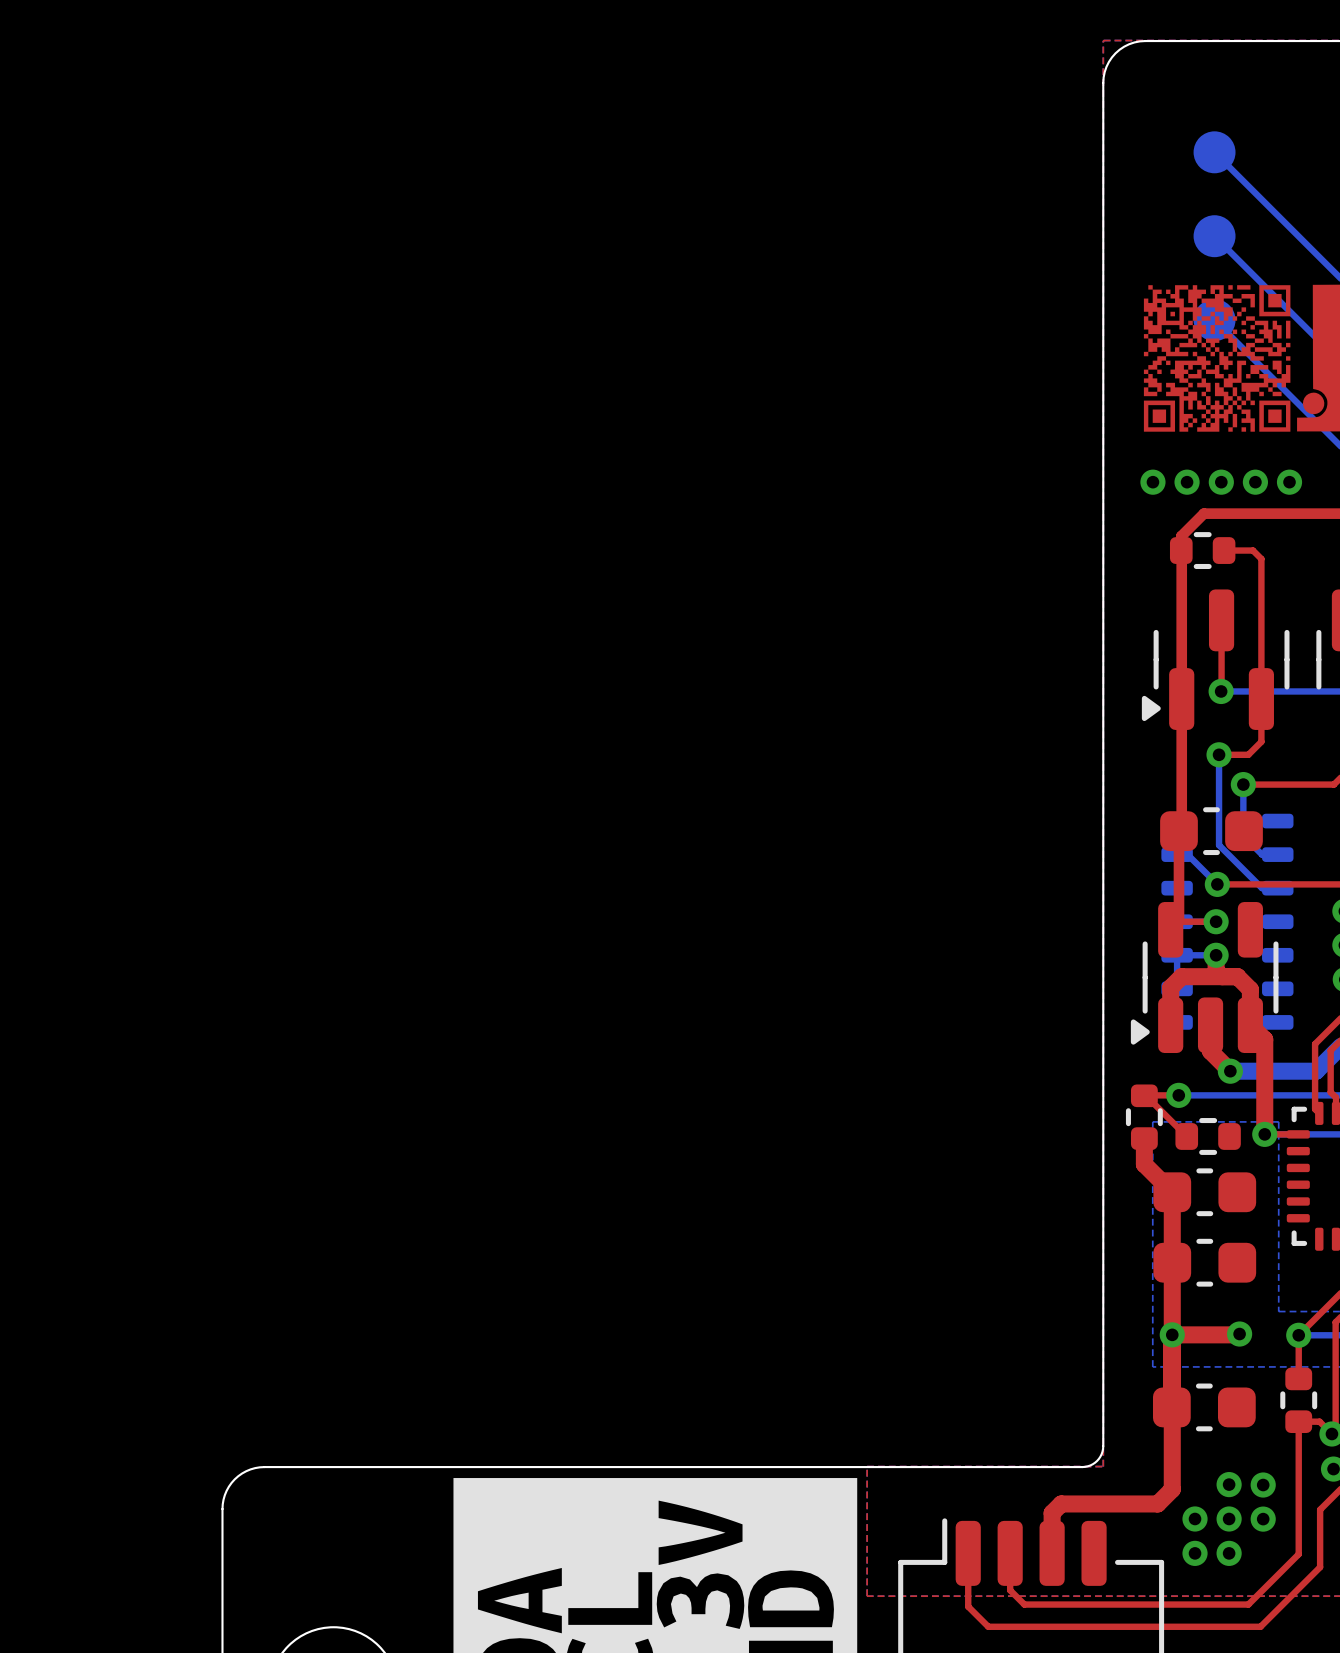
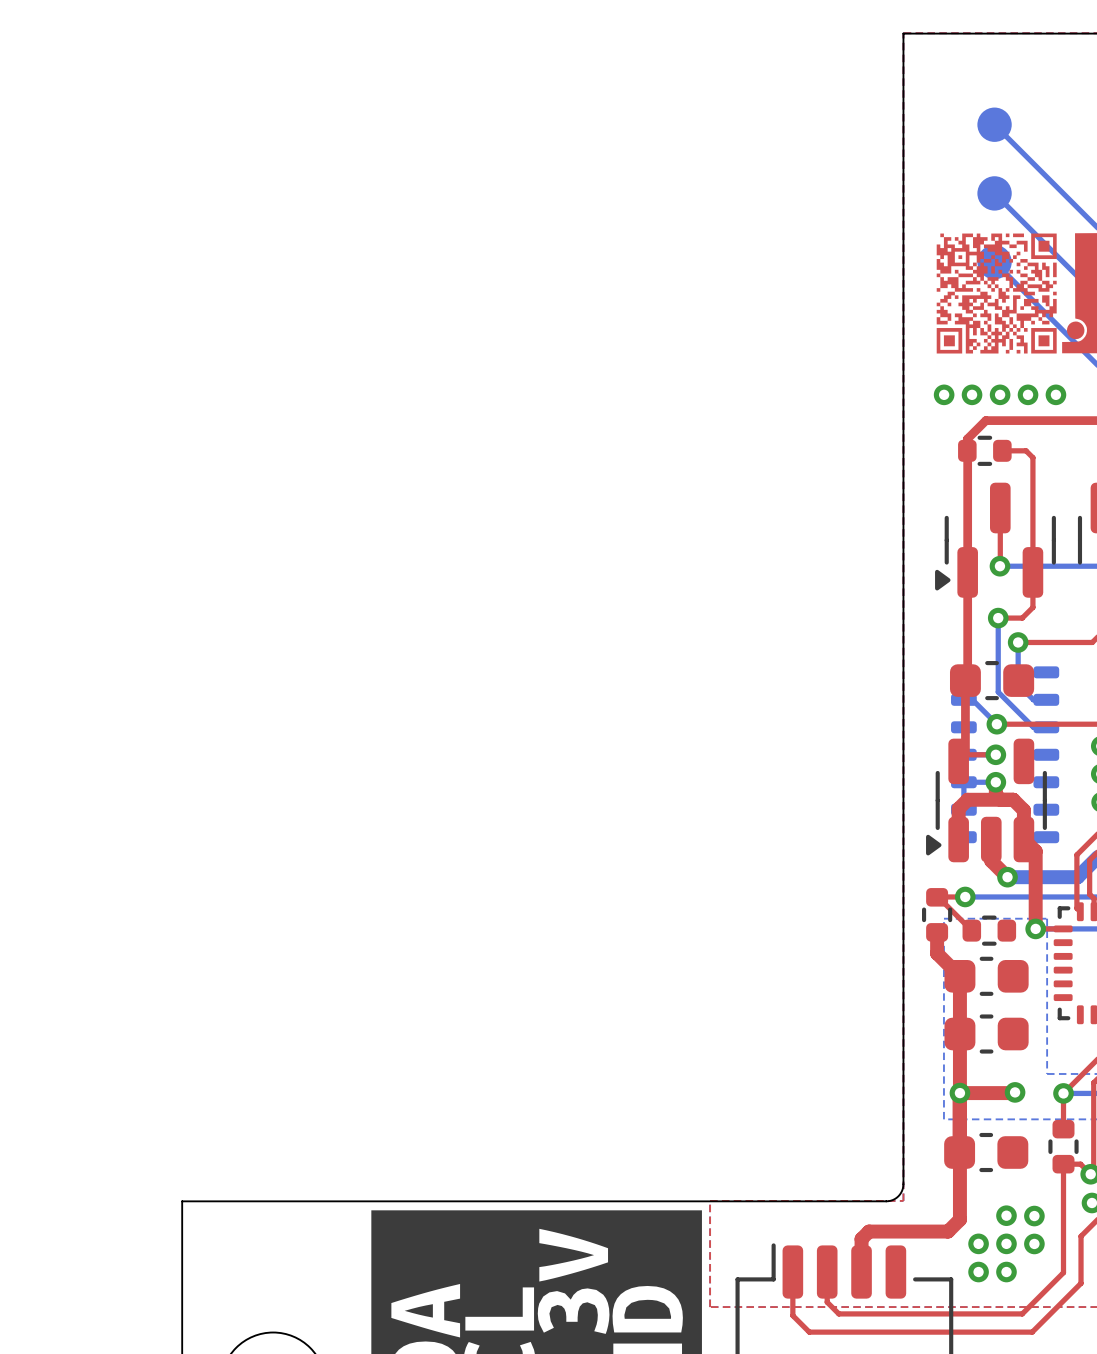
board edge: (1145, 41) (1129, 44) (1115, 53) (1106, 66) (1103, 82) -> (937, 33) (903, 33) (903, 67)
board edge: (264, 1467) (246, 1471) (234, 1479) (224, 1495) (222, 1509) -> (216, 1201) (182, 1201) (182, 1235)

